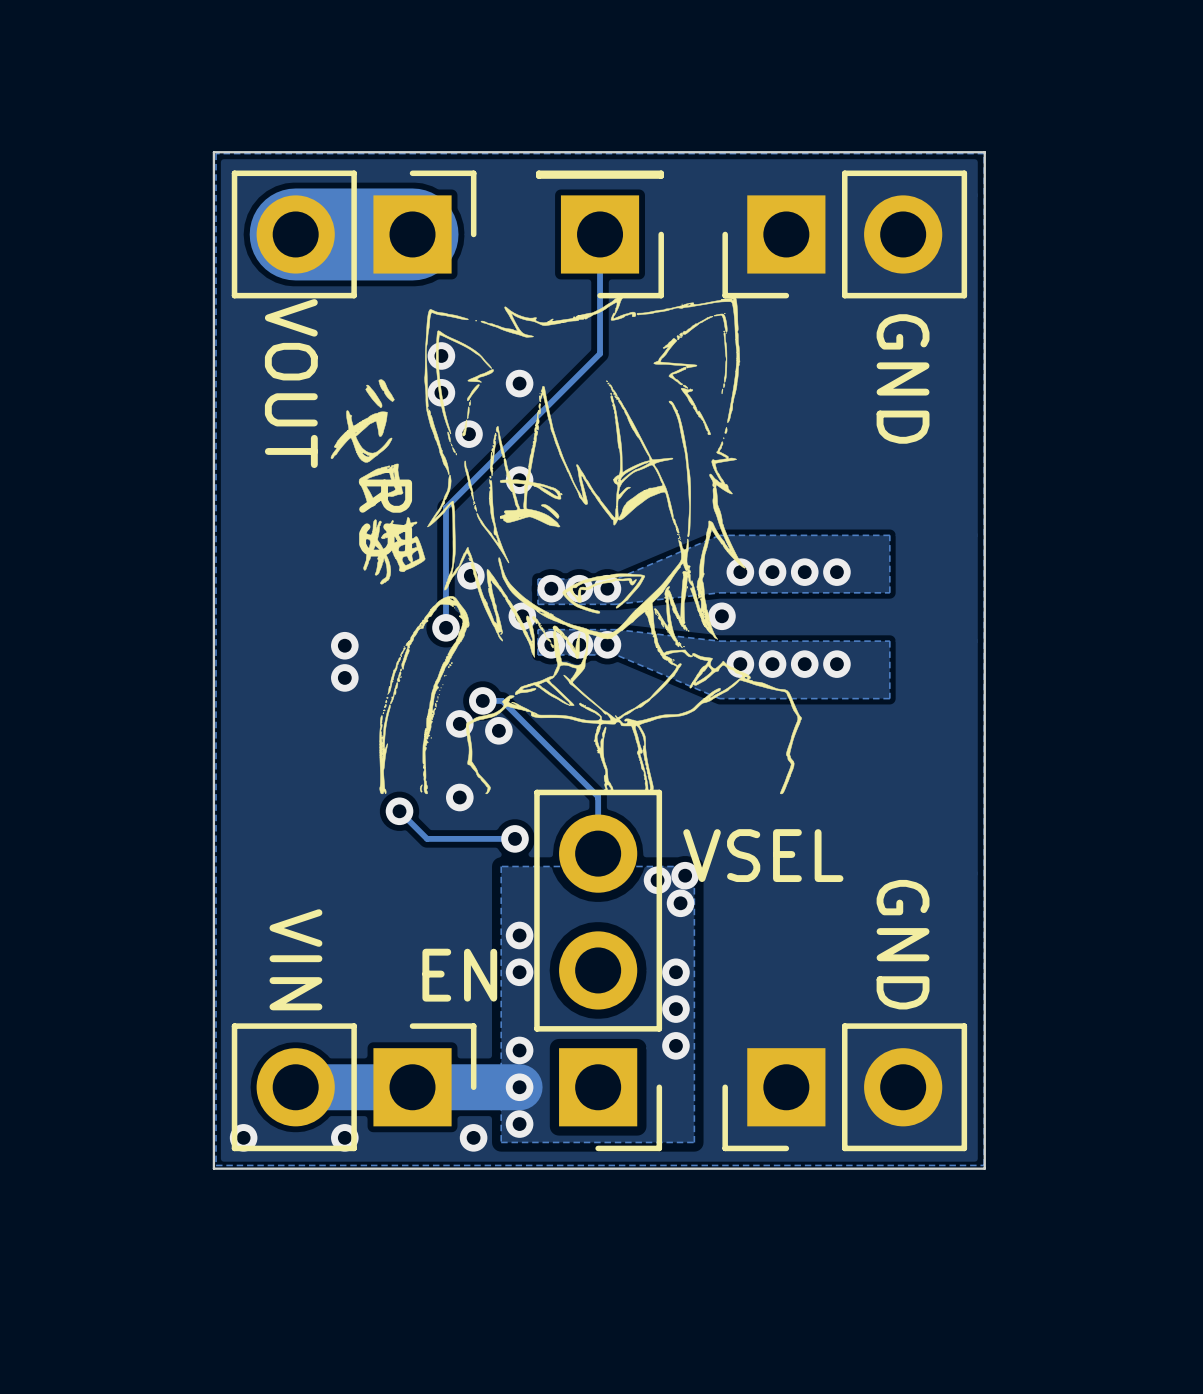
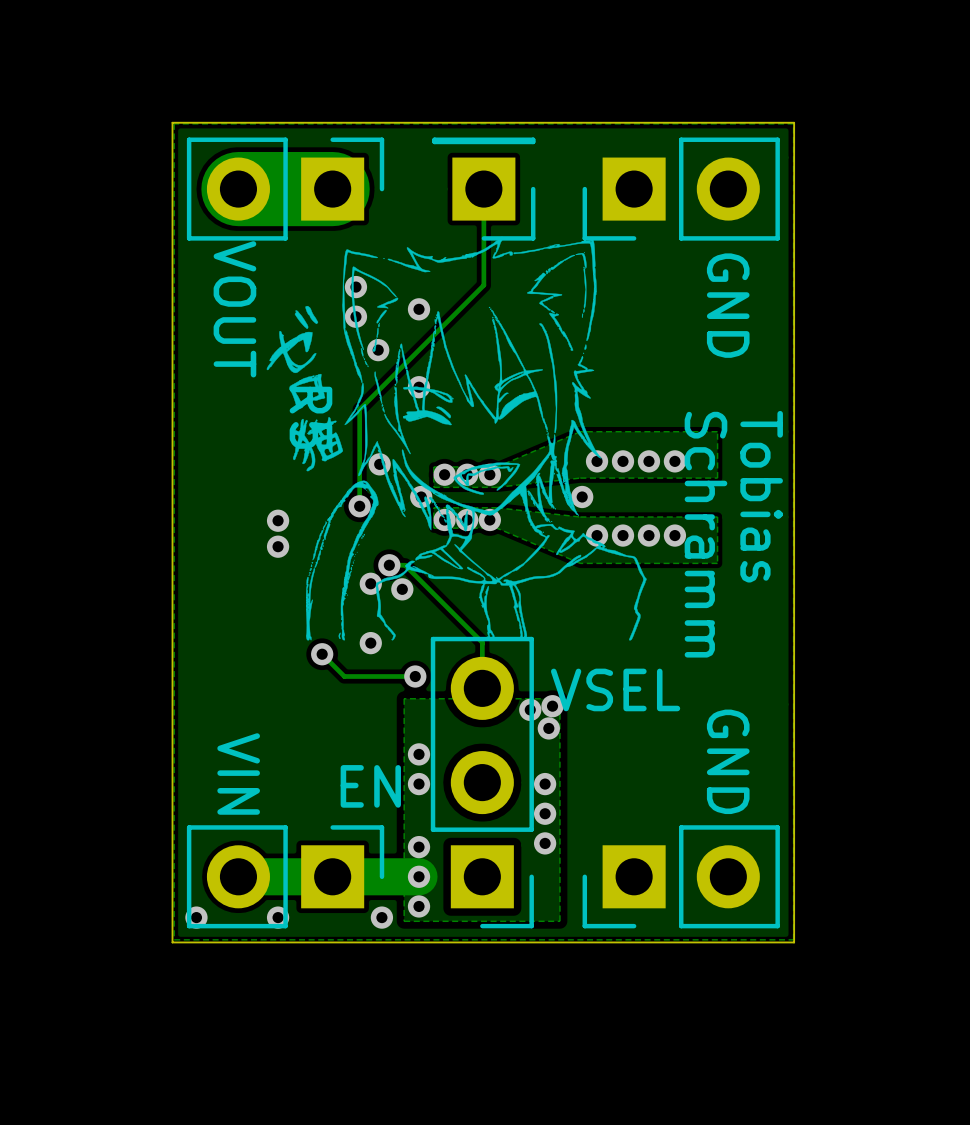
text: none -> Tobias (761, 496)
text: none -> Schramm (705, 534)

